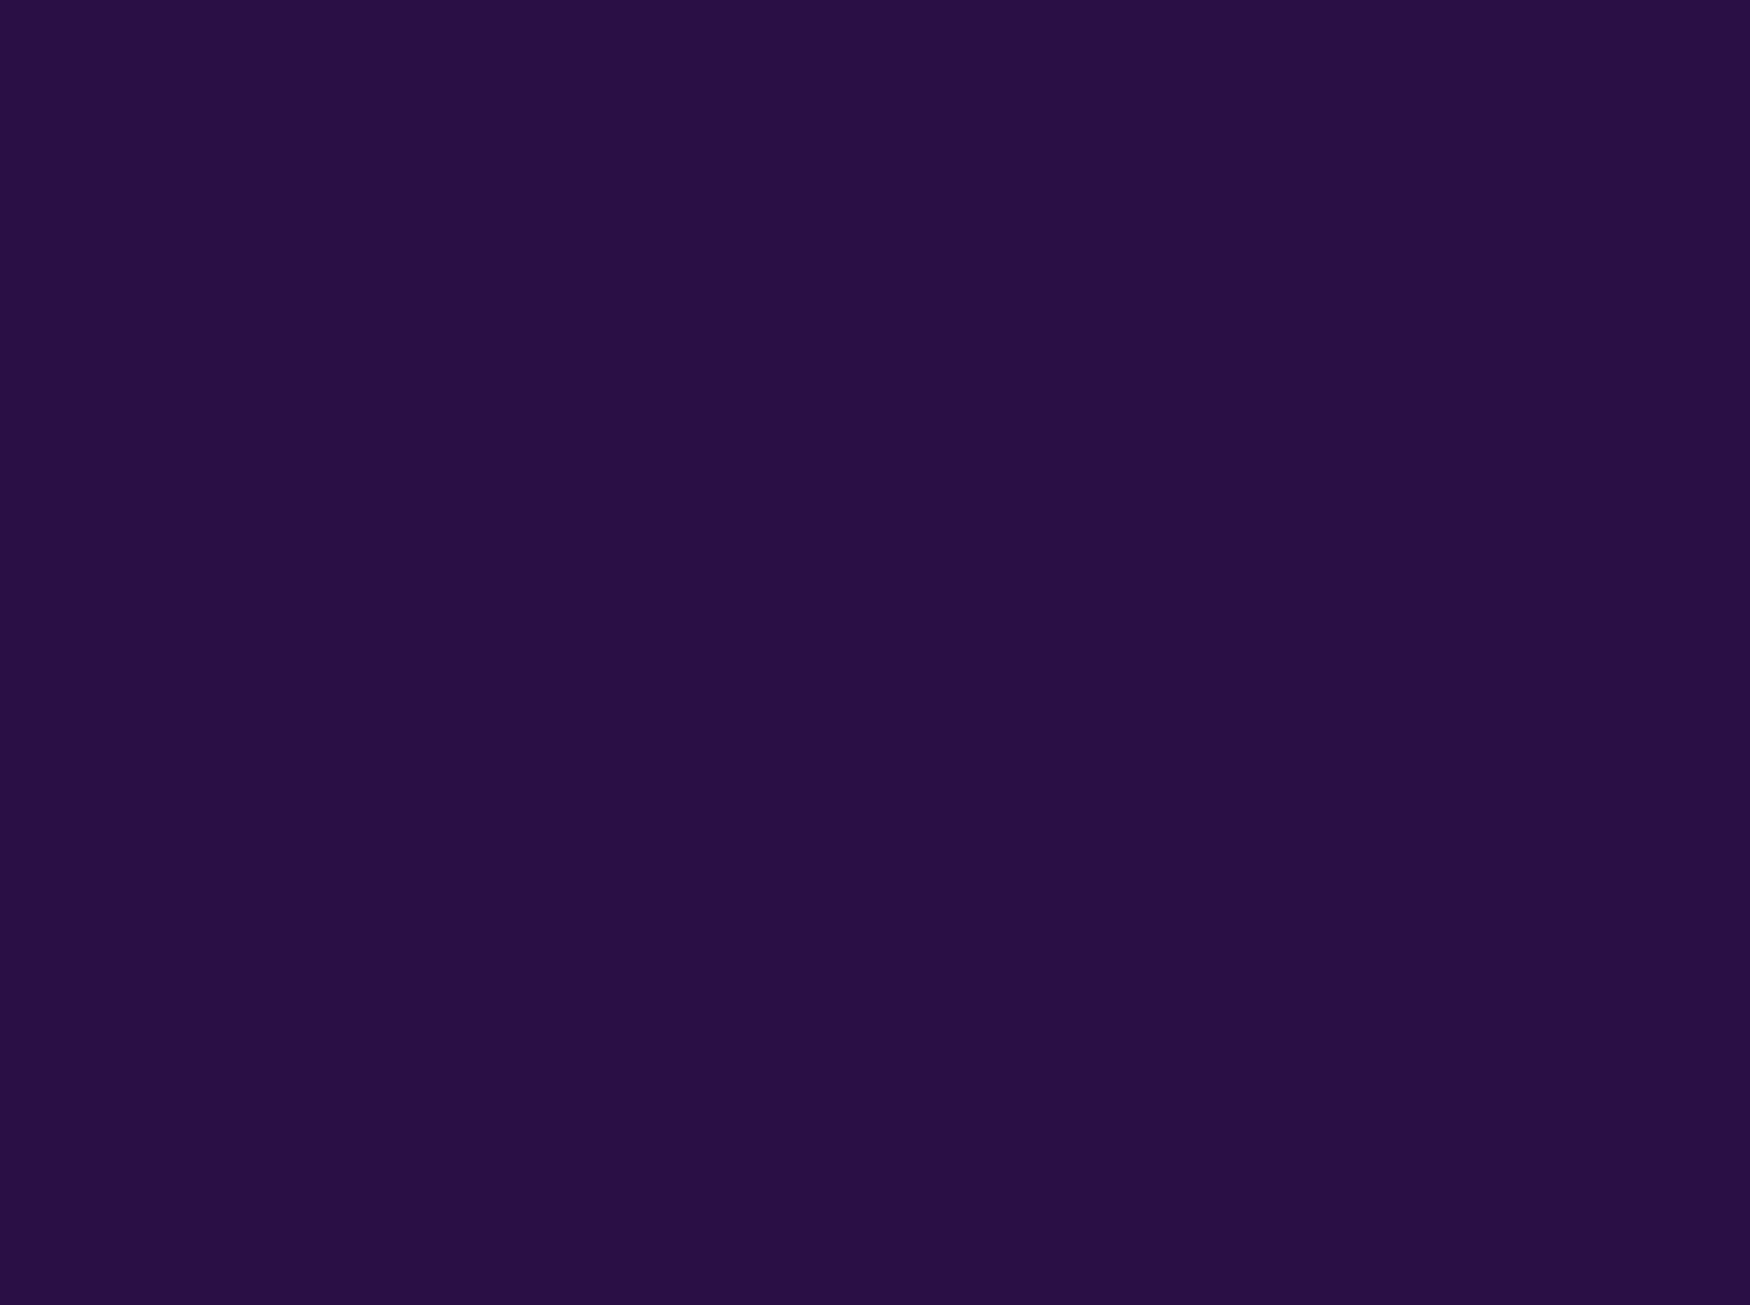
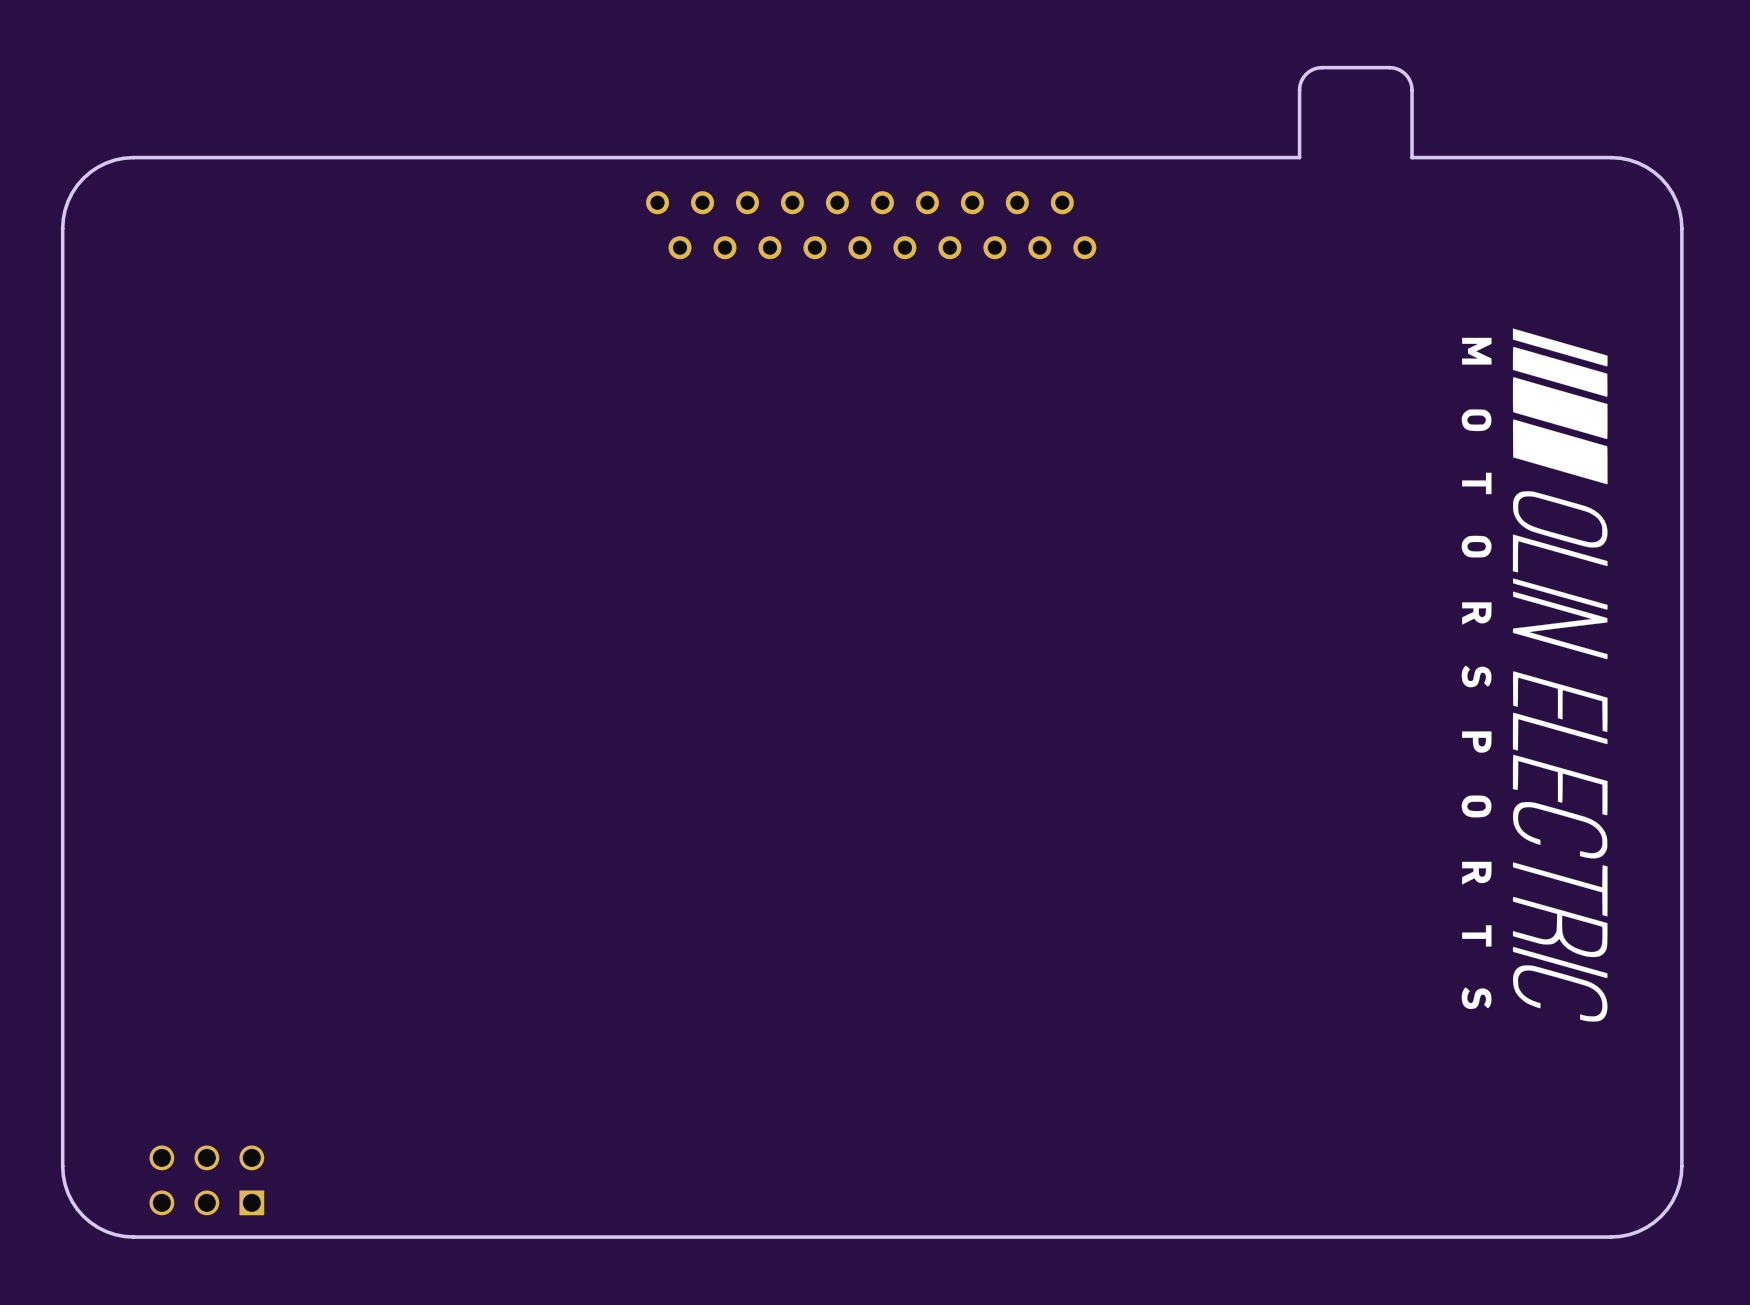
board edge: none -> (1389, 67) (1319, 67) (1306, 74) (1299, 87) (1299, 157) (133, 157) (106, 162) (90, 172) (72, 193) (65, 210) (62, 228) (62, 1166) (68, 1193) (77, 1209) (90, 1222) (106, 1231) (133, 1237) (1611, 1237) (1629, 1234) (1654, 1222) (1667, 1209) (1676, 1193) (1681, 1166) (1681, 228) (1679, 210) (1672, 193) (1661, 178) (1646, 167) (1620, 158) (1412, 157) (1411, 84) (1403, 72) (1389, 67)
part: none -> (871, 225)
drawing: none -> [1461, 328, 1608, 1022]
part: none -> (206, 1180)

